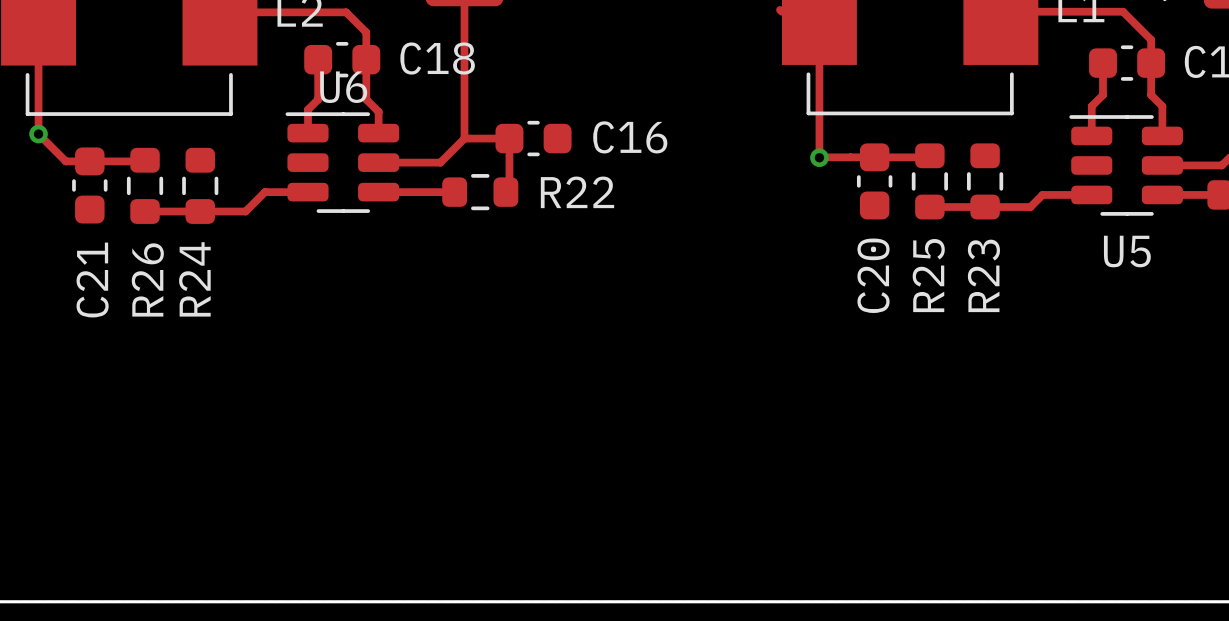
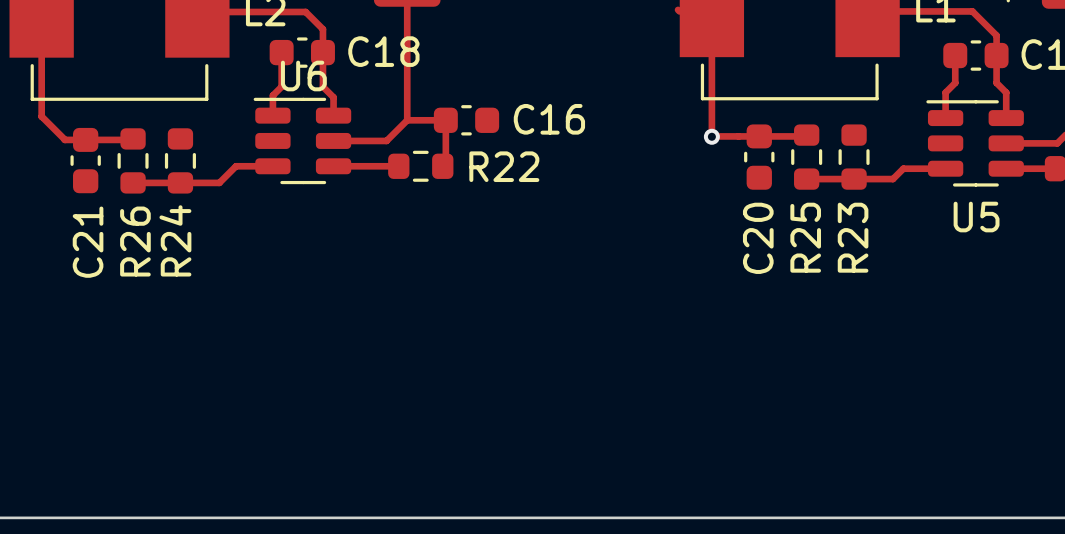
via: (38, 134) -> none

